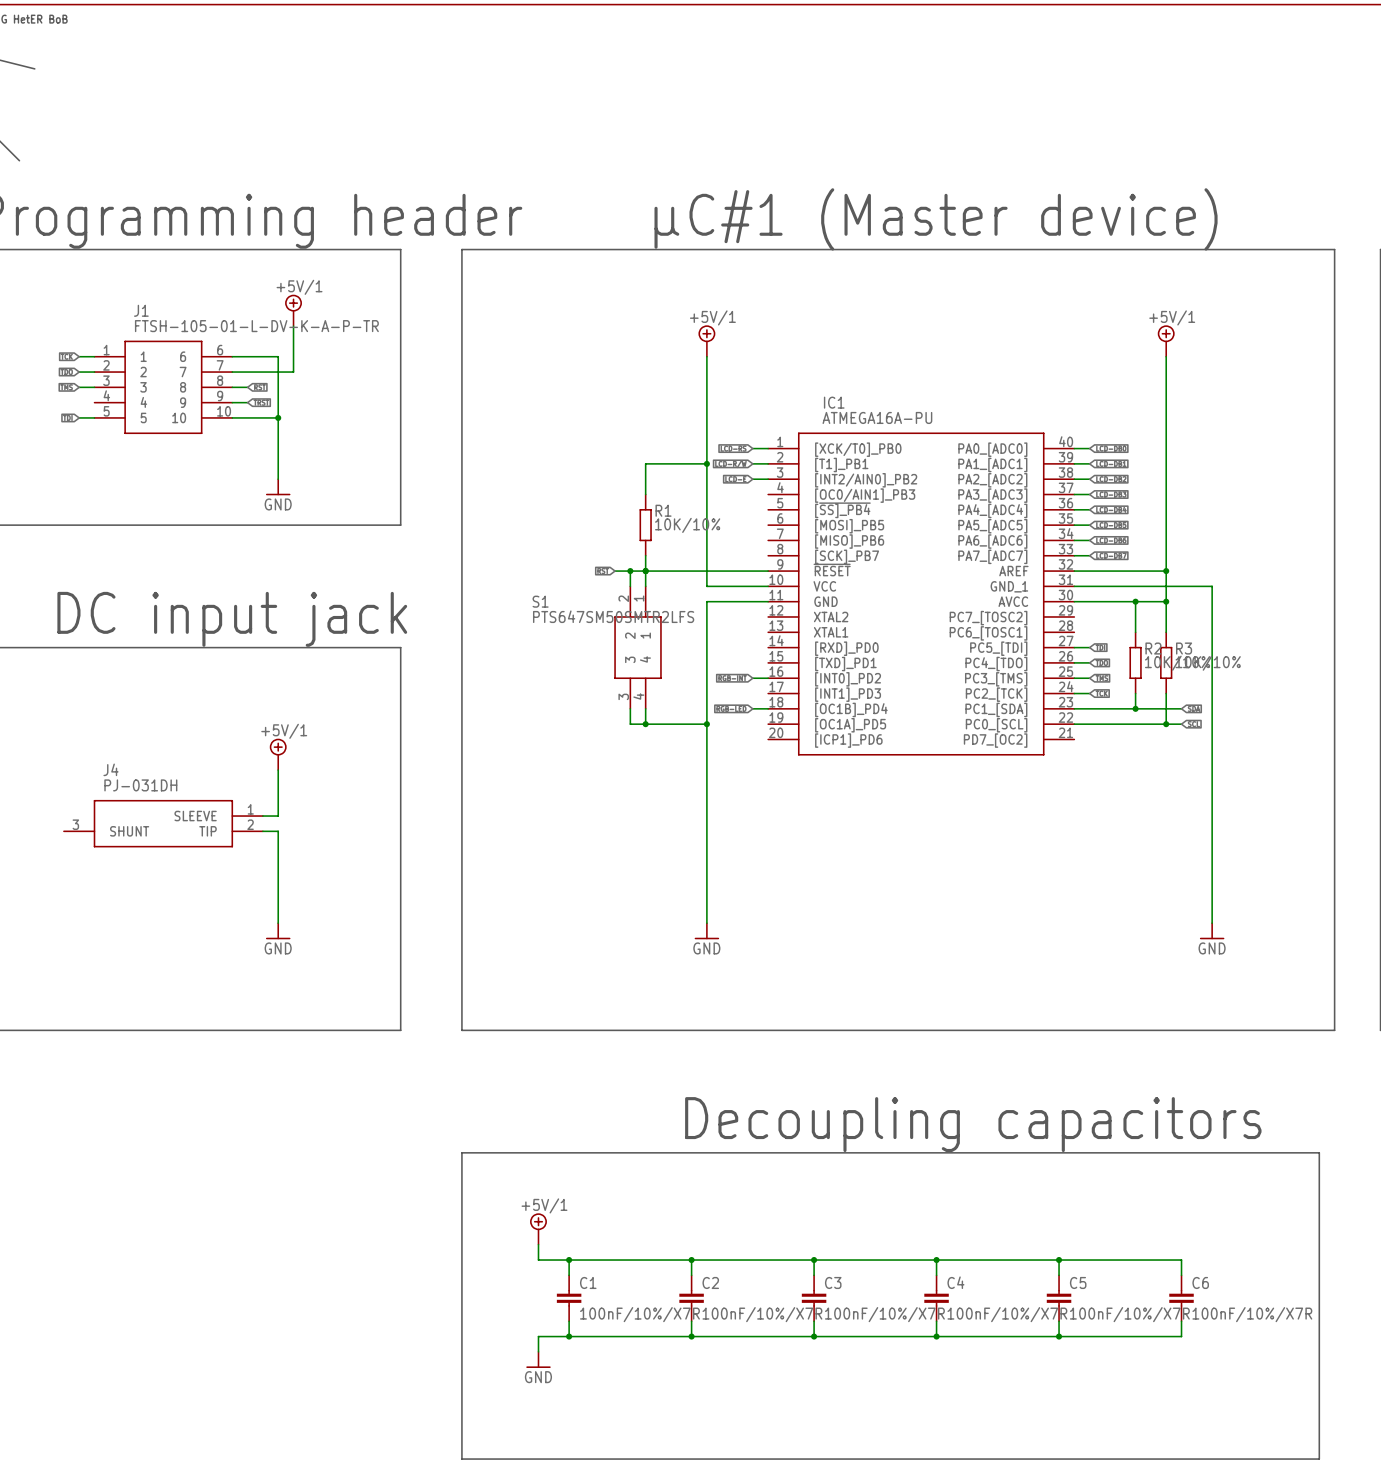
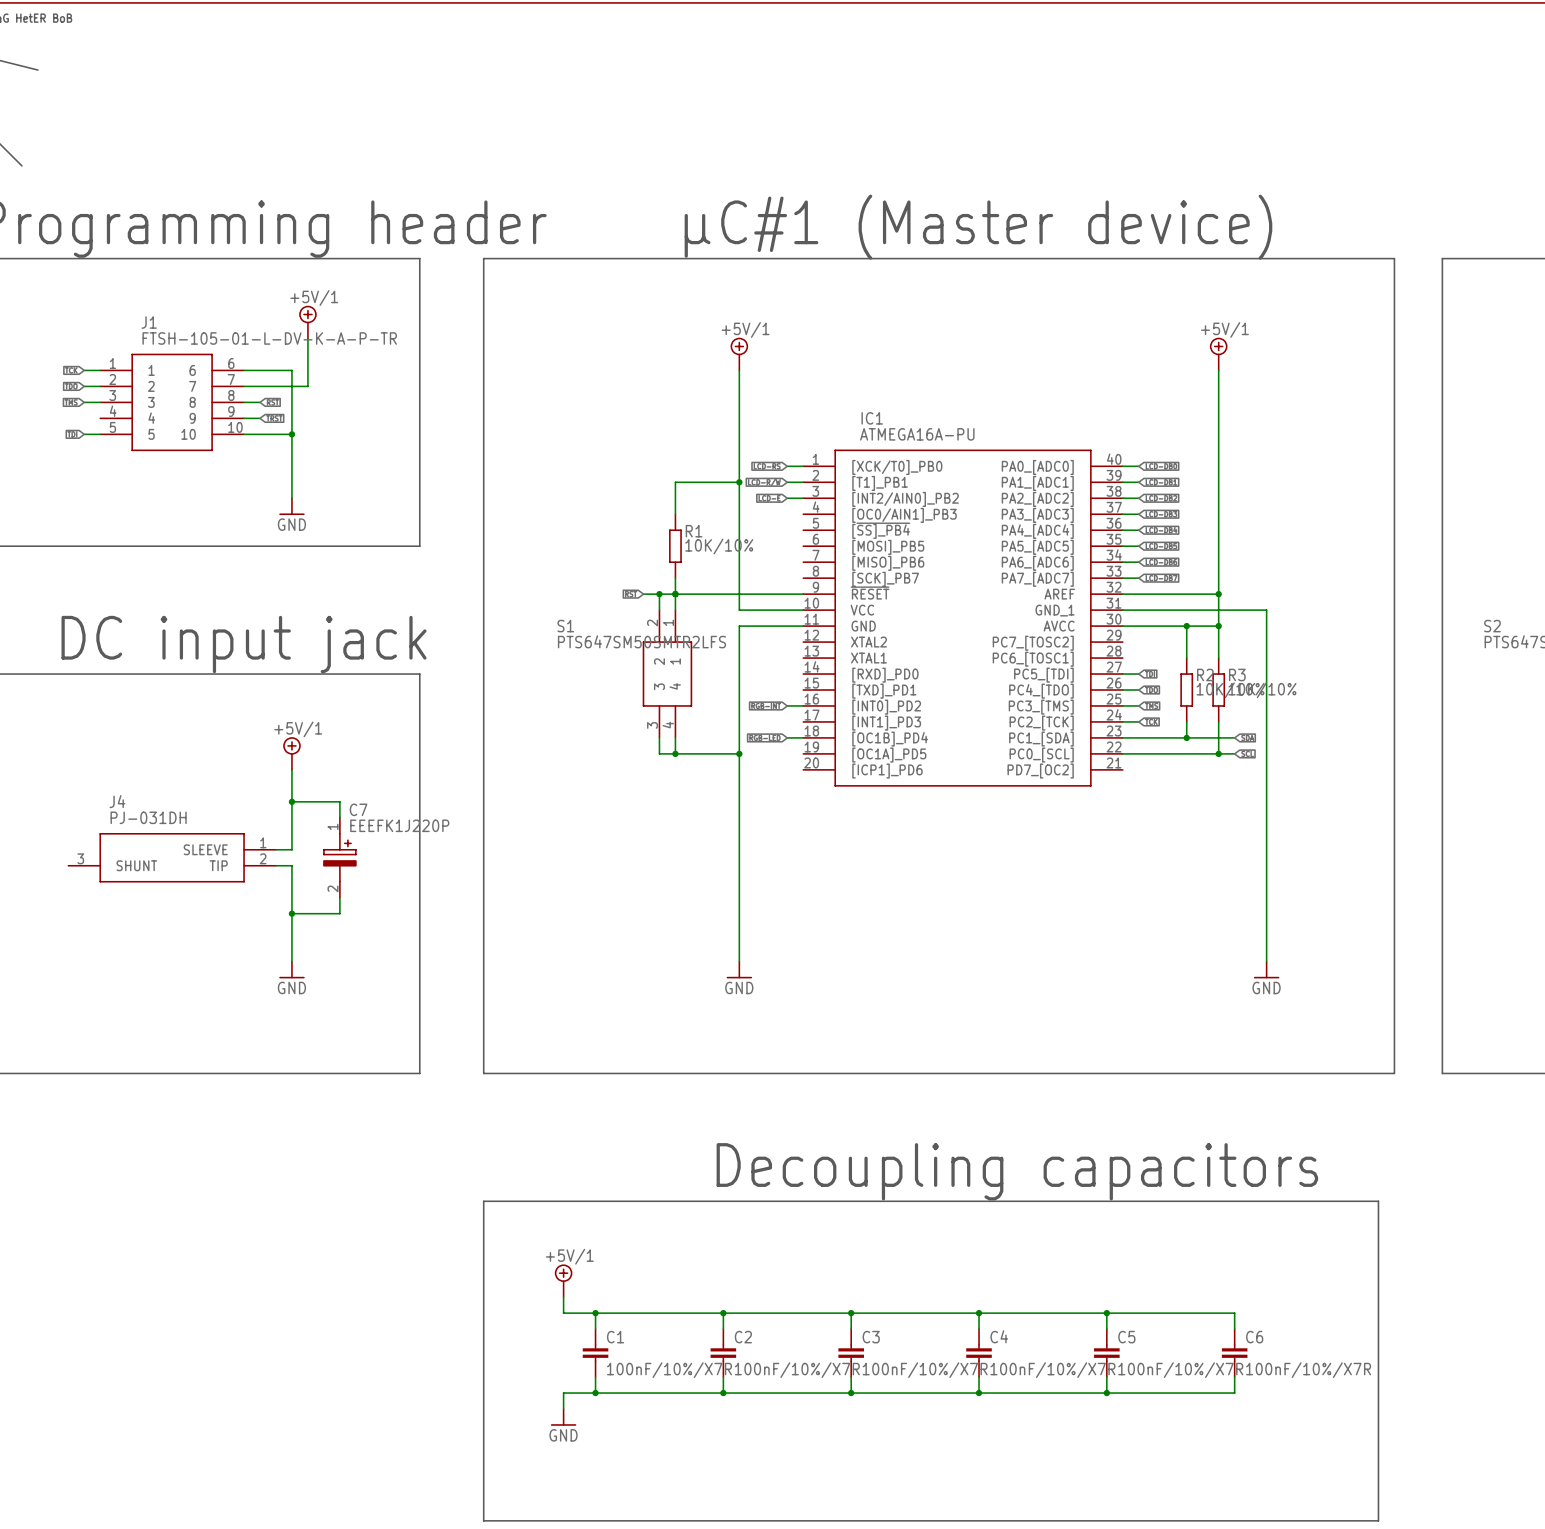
wire: none -> (291, 769) (291, 801) (339, 801) (339, 817)
power symbol position: +5V/1 (278, 754) -> +5V/1 (291, 753)
junction: none -> (291, 801)
C7: none -> EEEFK1J220P (339, 857)
wire: none -> (339, 897) (339, 913) (291, 913)
junction: none -> (291, 913)

